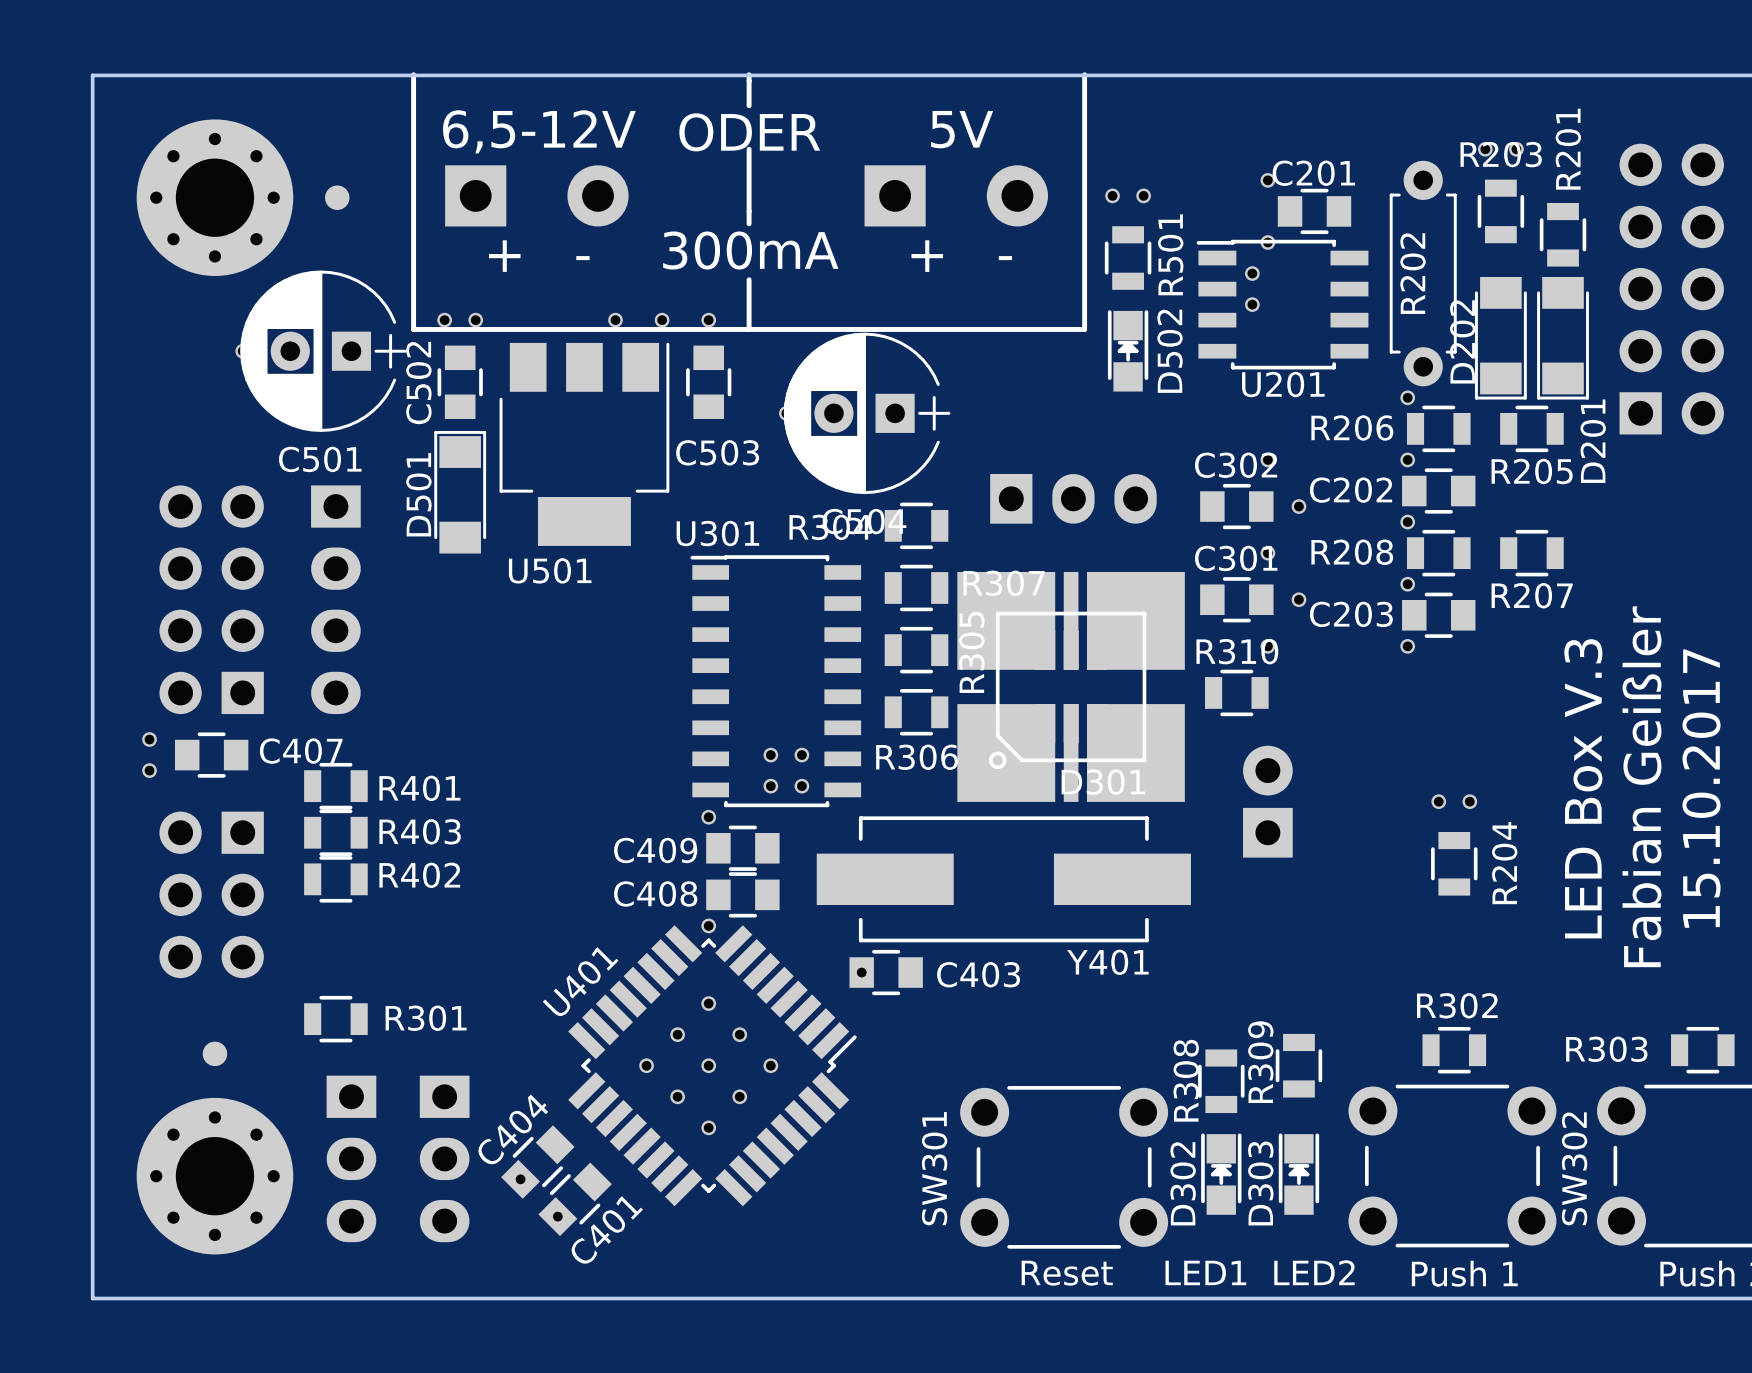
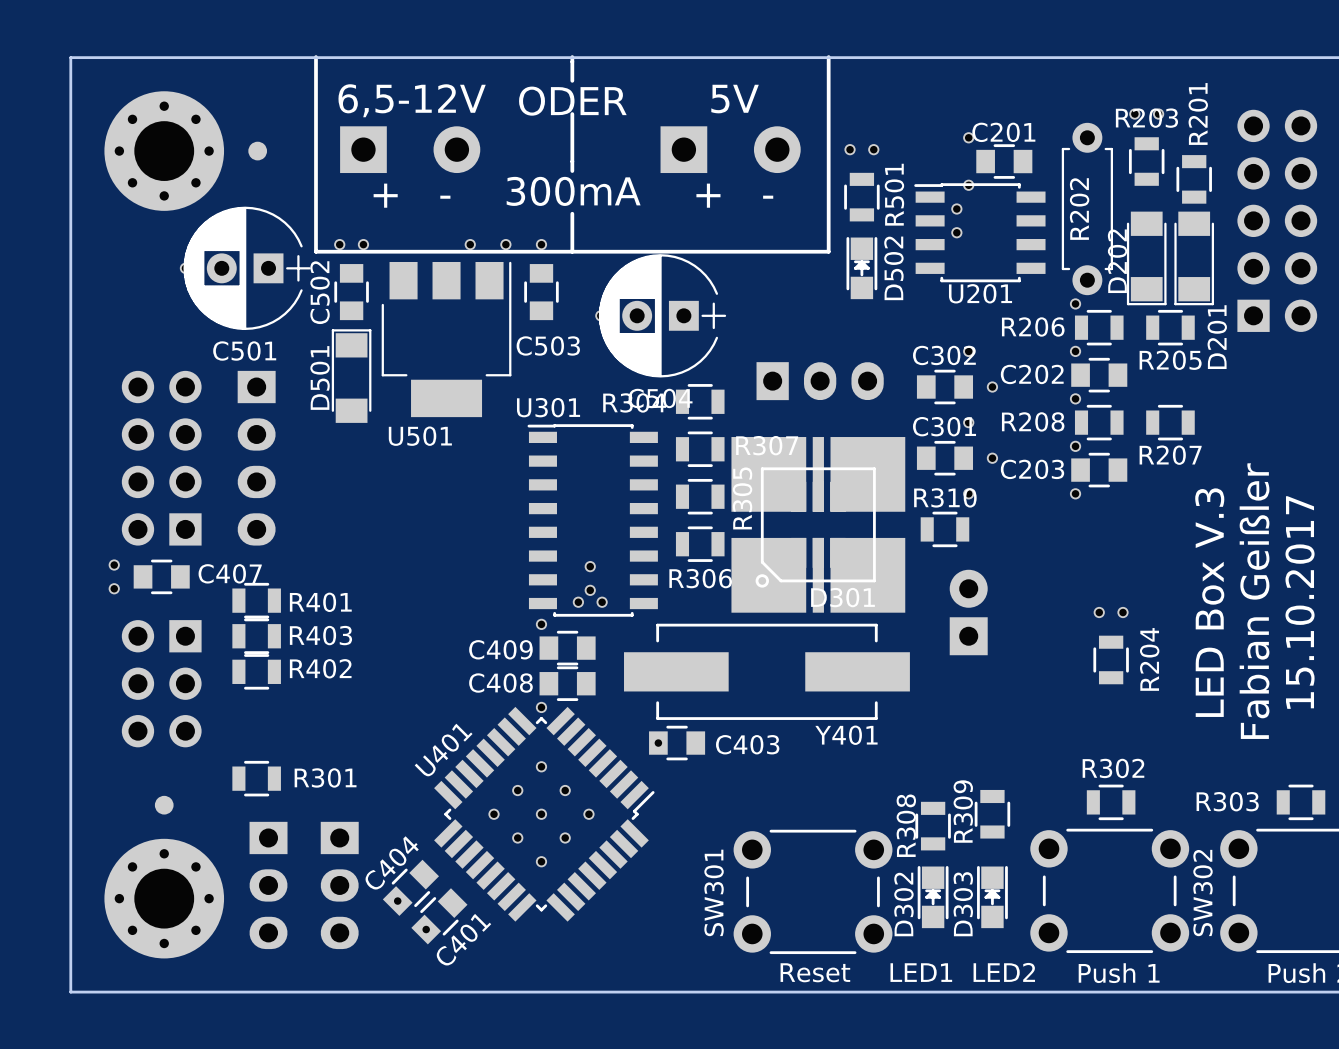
part: none -> (590, 566)
part: (770, 755) -> none
part: (801, 755) -> none
part: none -> (590, 590)
part: (770, 786) -> none
part: (801, 786) -> none
part: none -> (578, 602)
part: none -> (602, 602)

